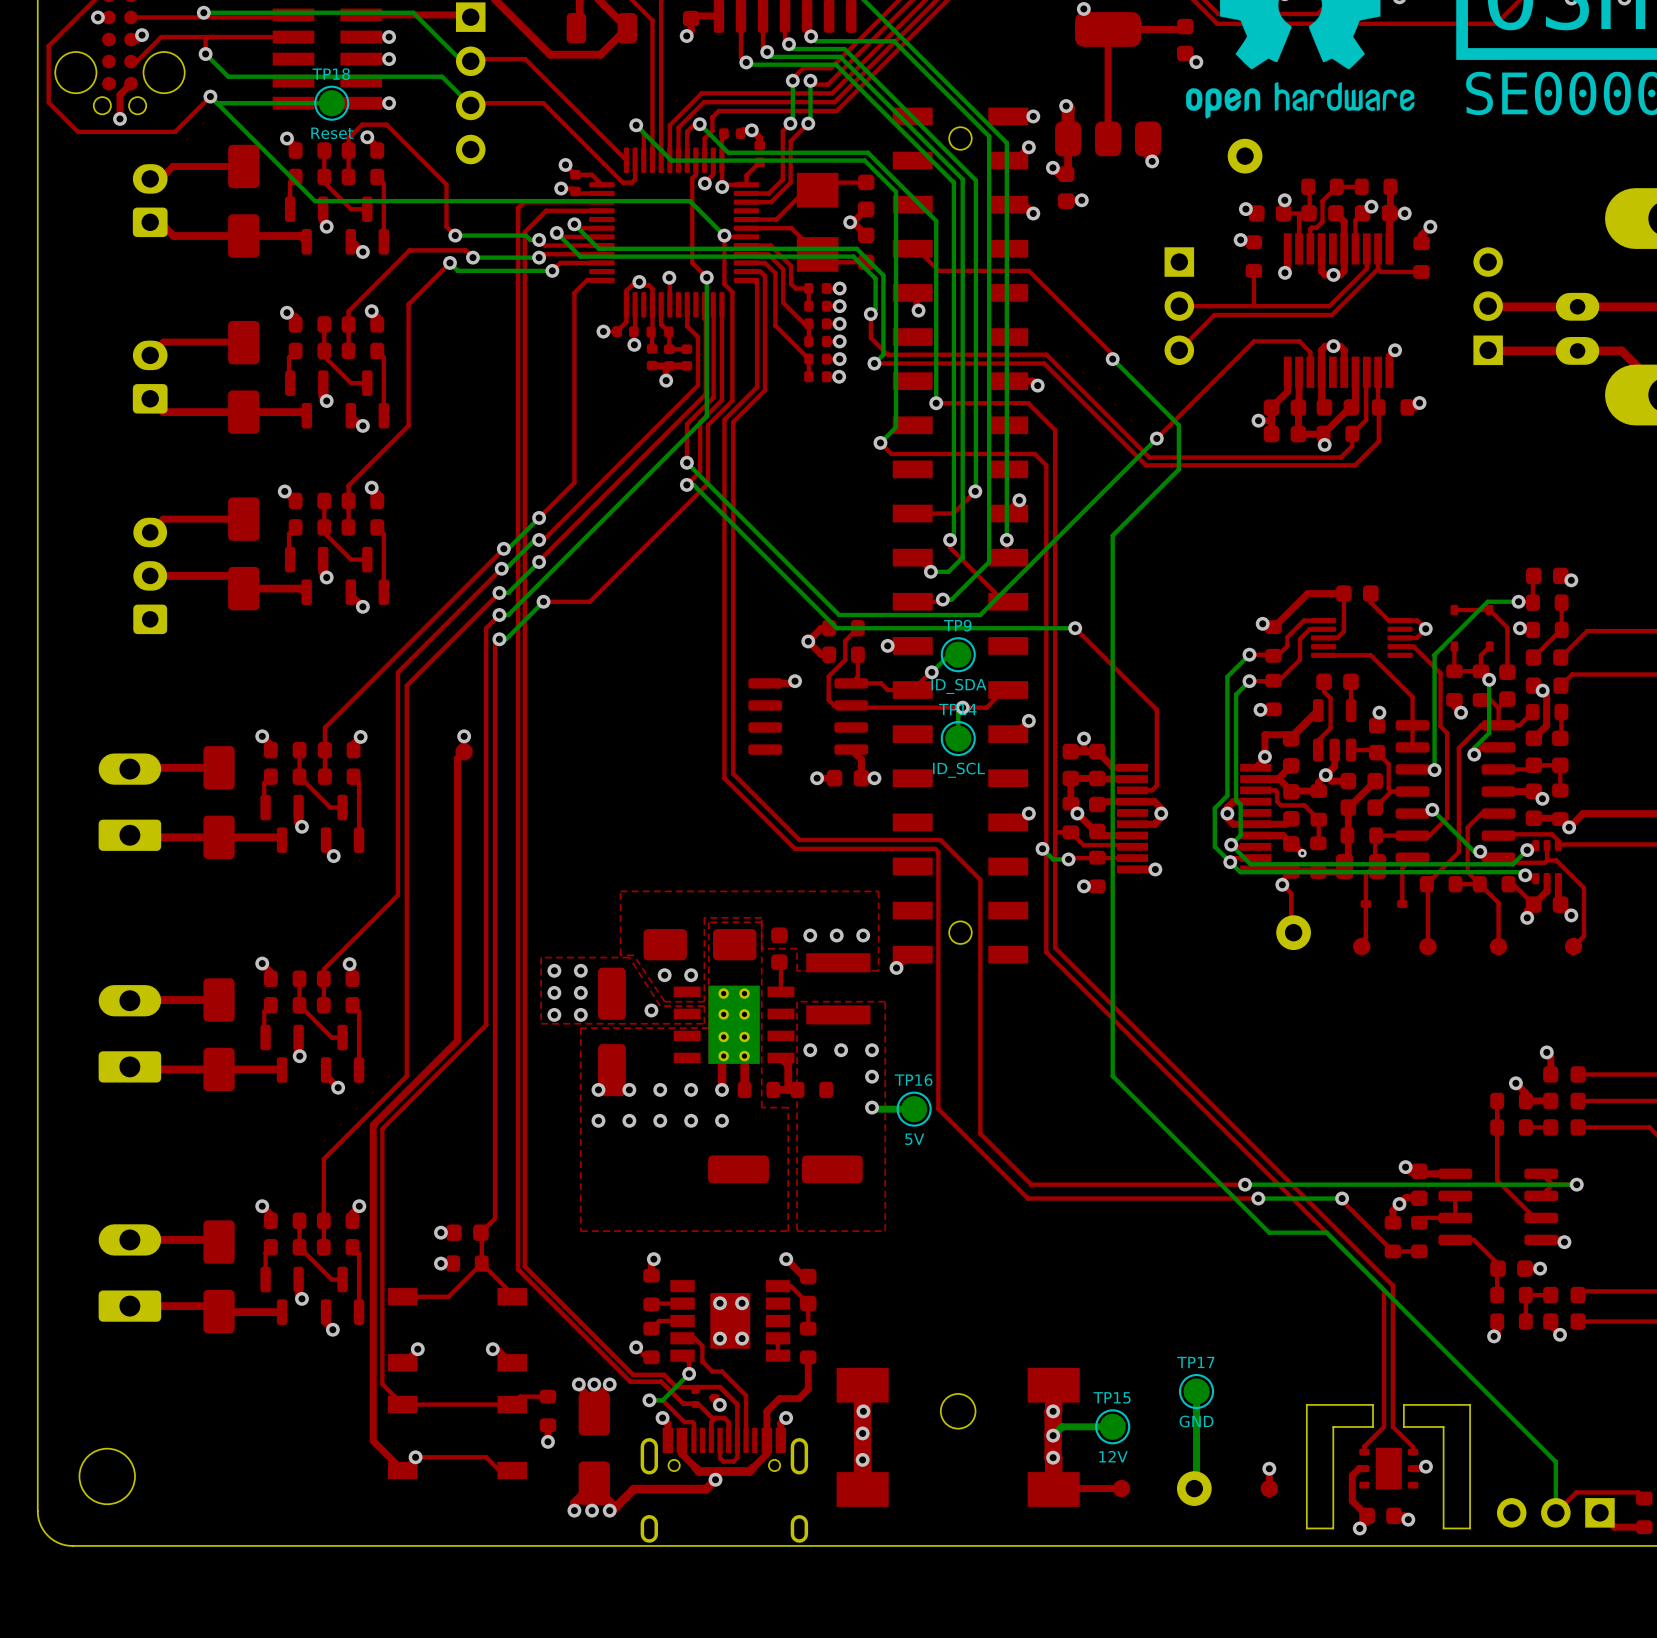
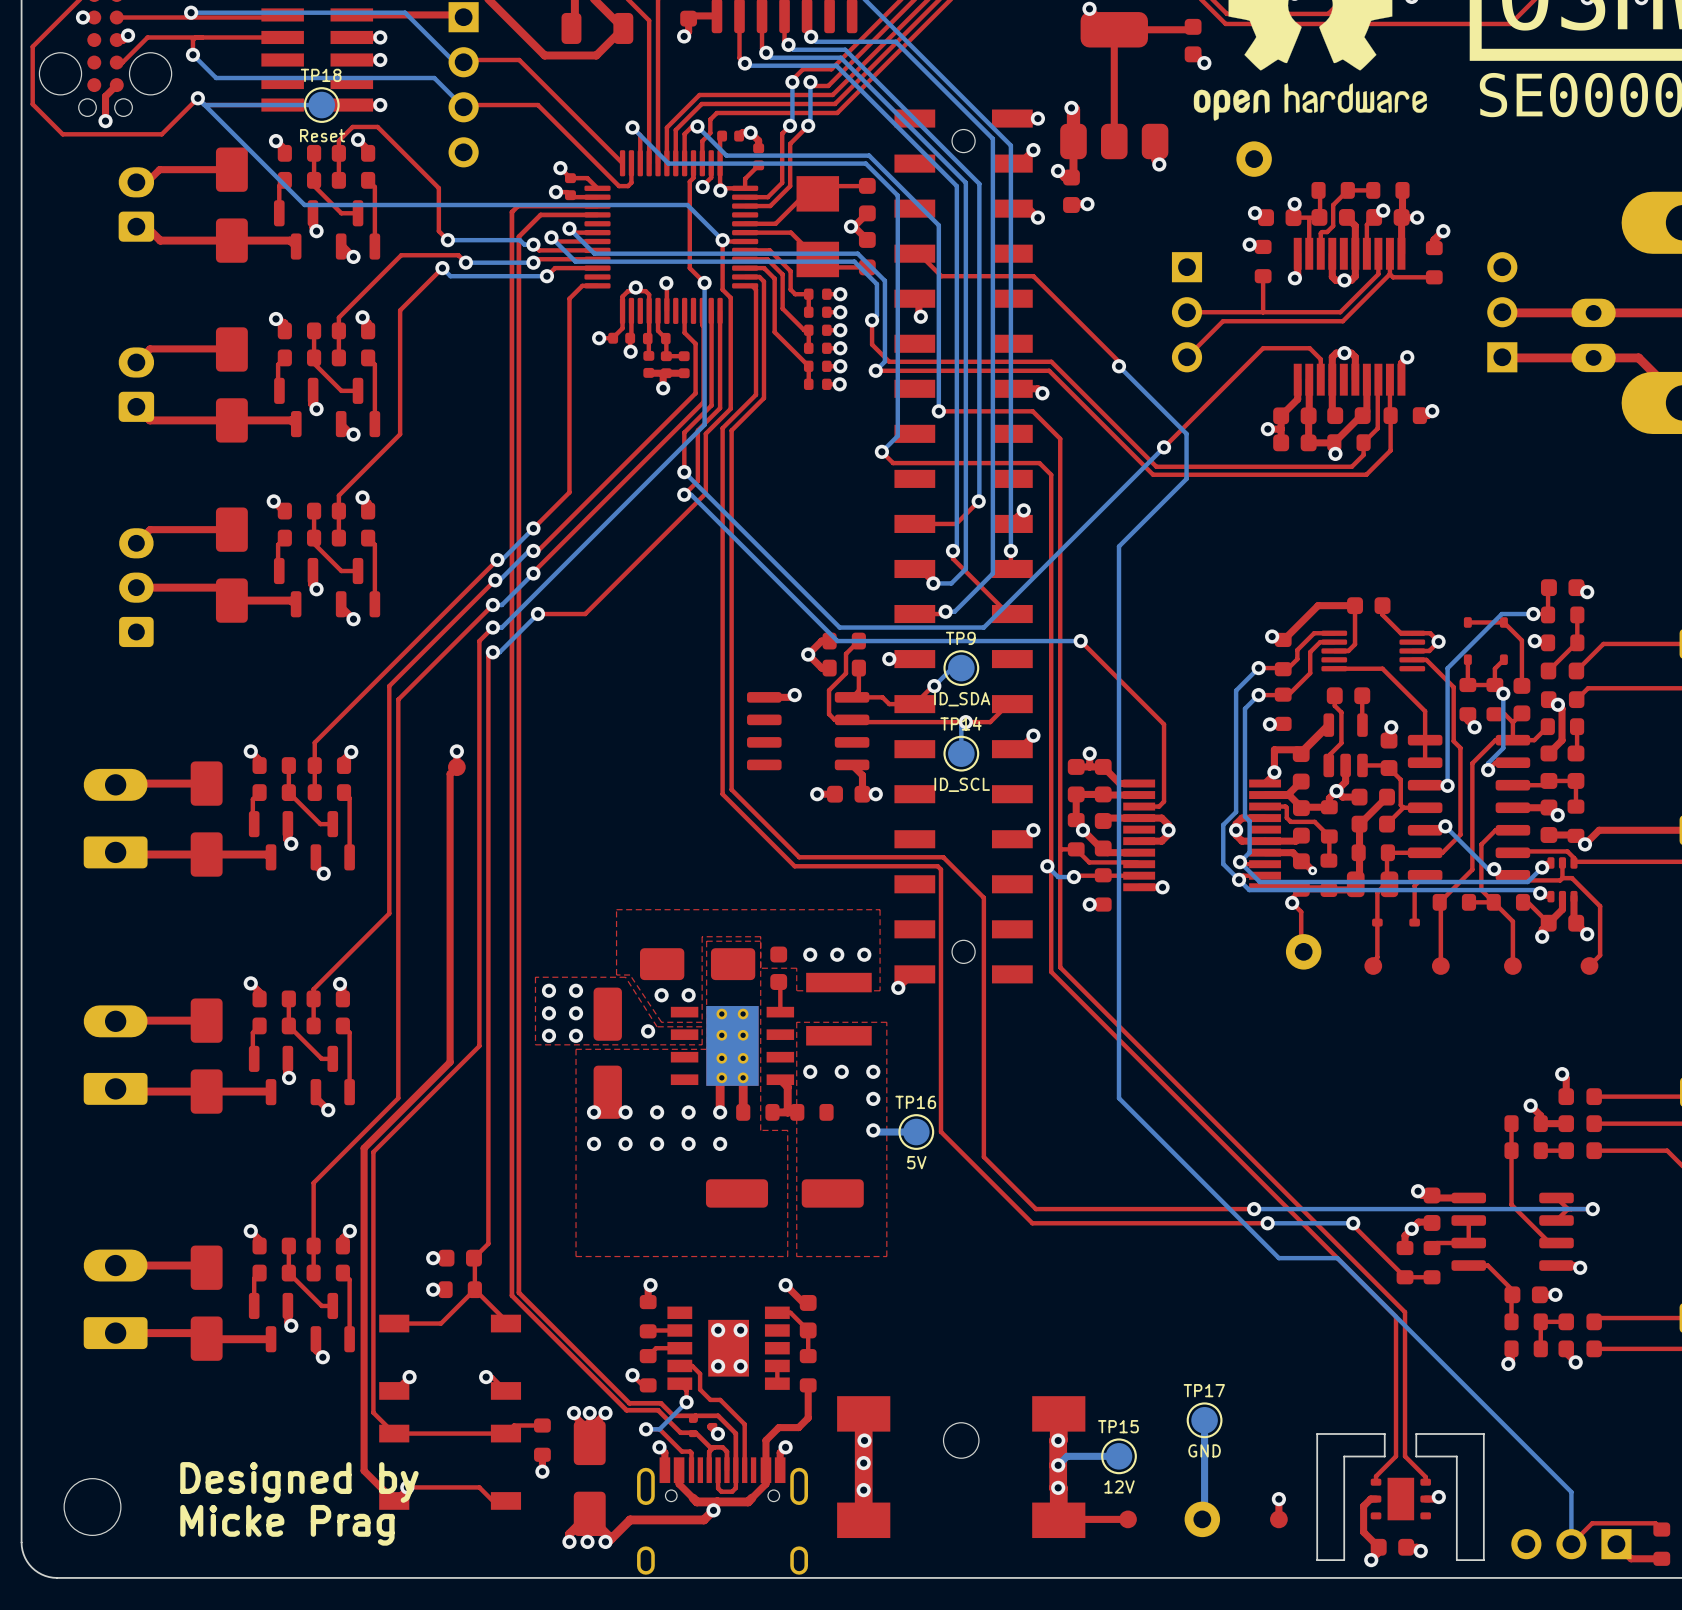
text: none -> Designed by (299, 1482)
text: none -> Micke Prag (287, 1525)

